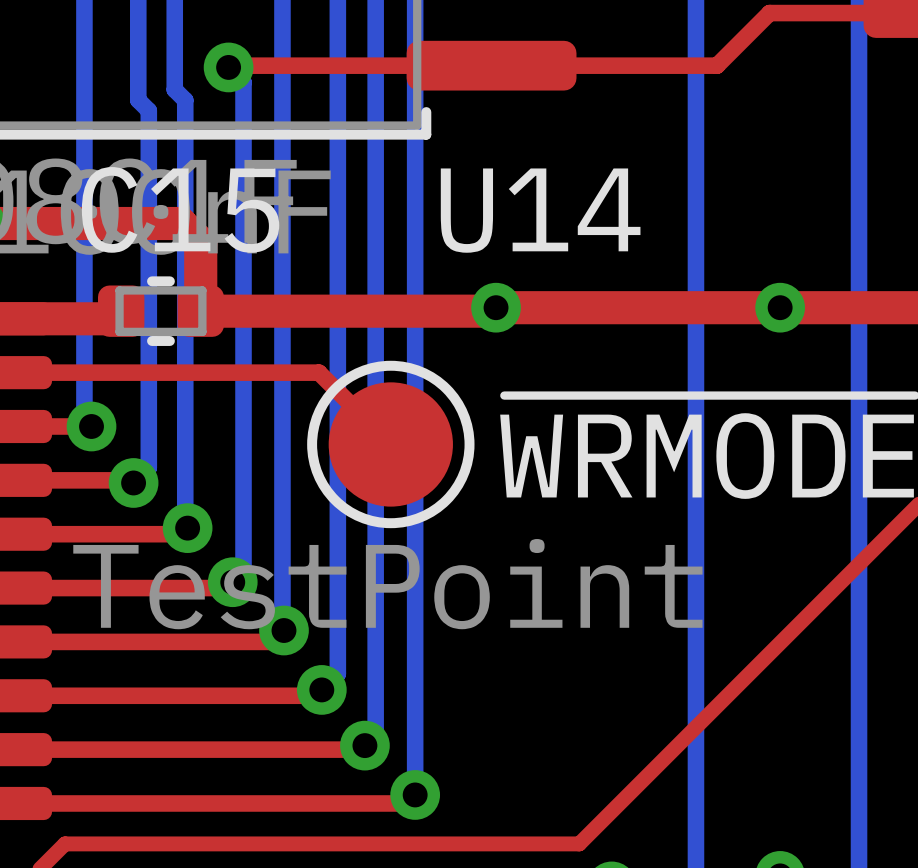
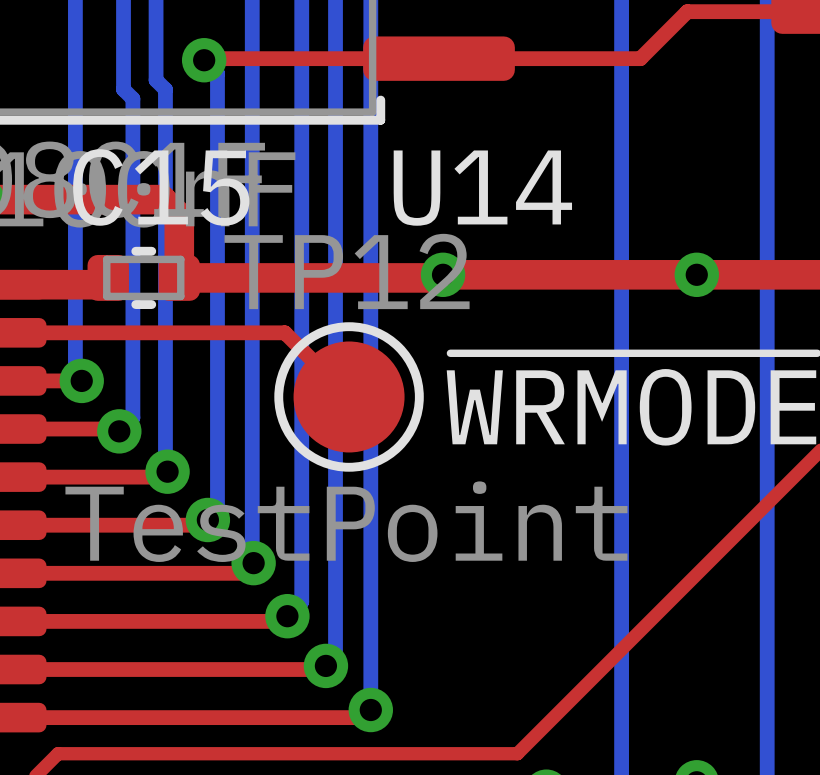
TP12 name: none -> TP12 (347, 271)

